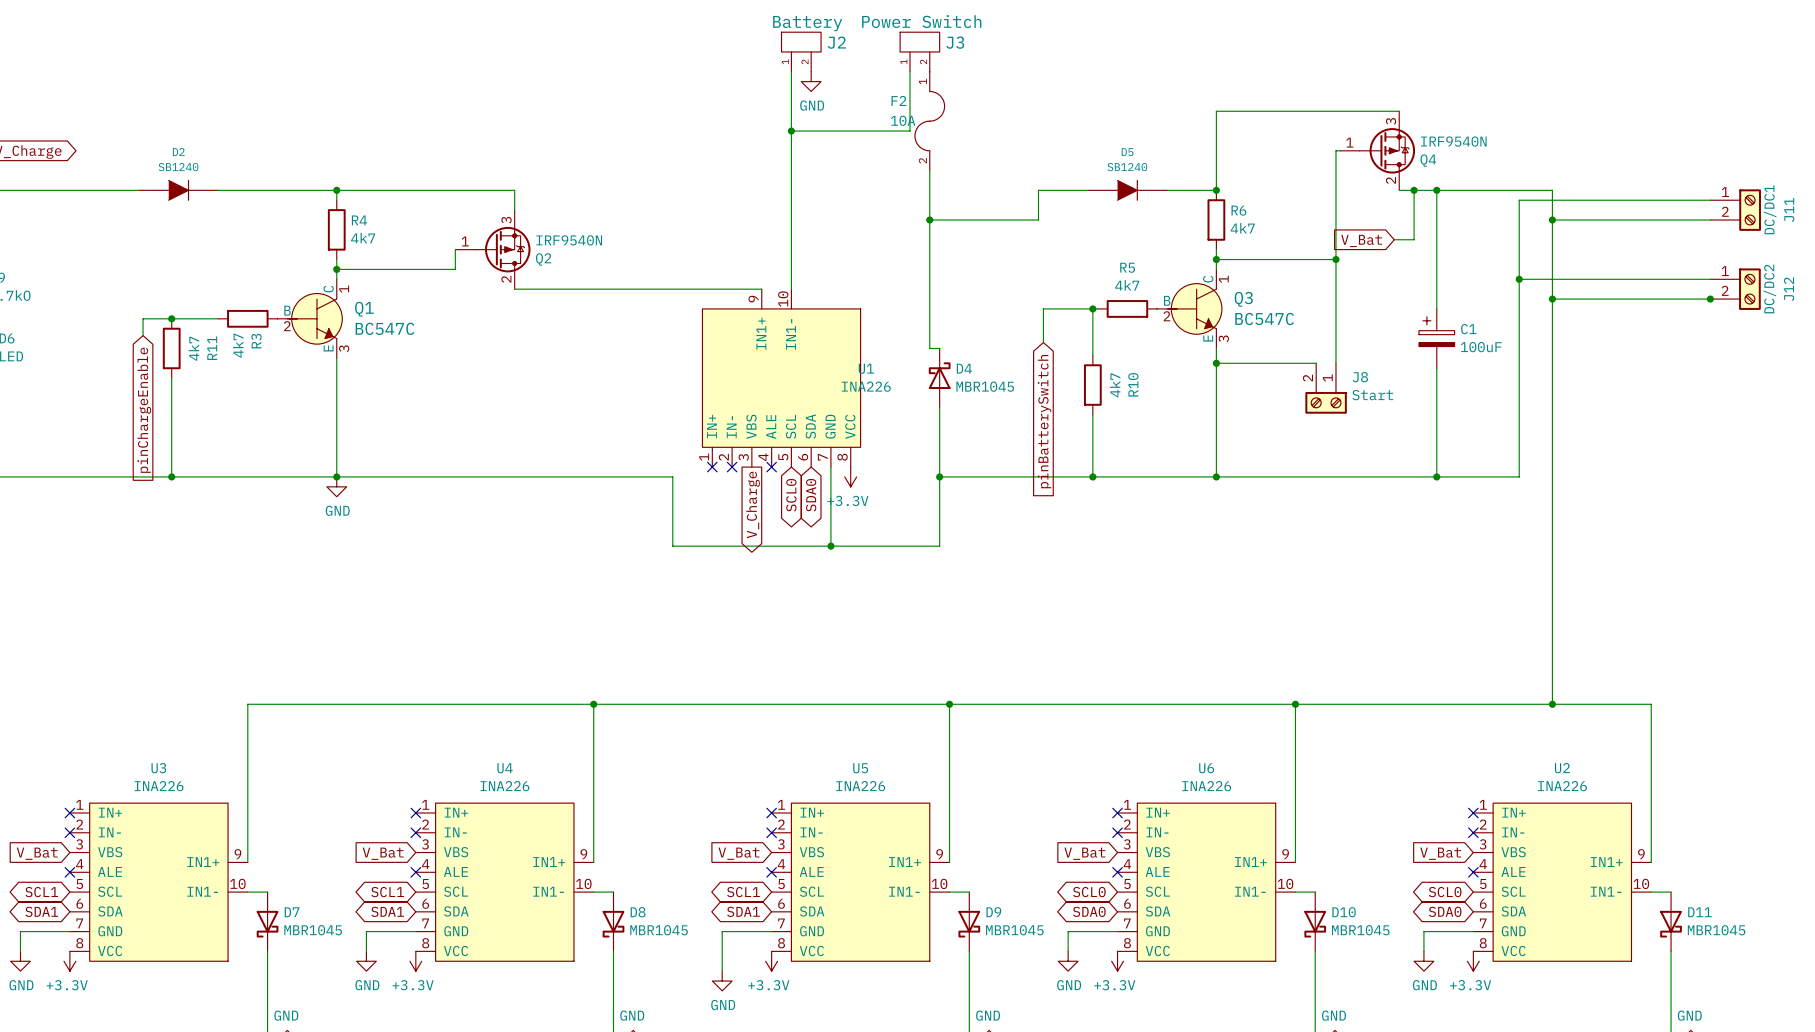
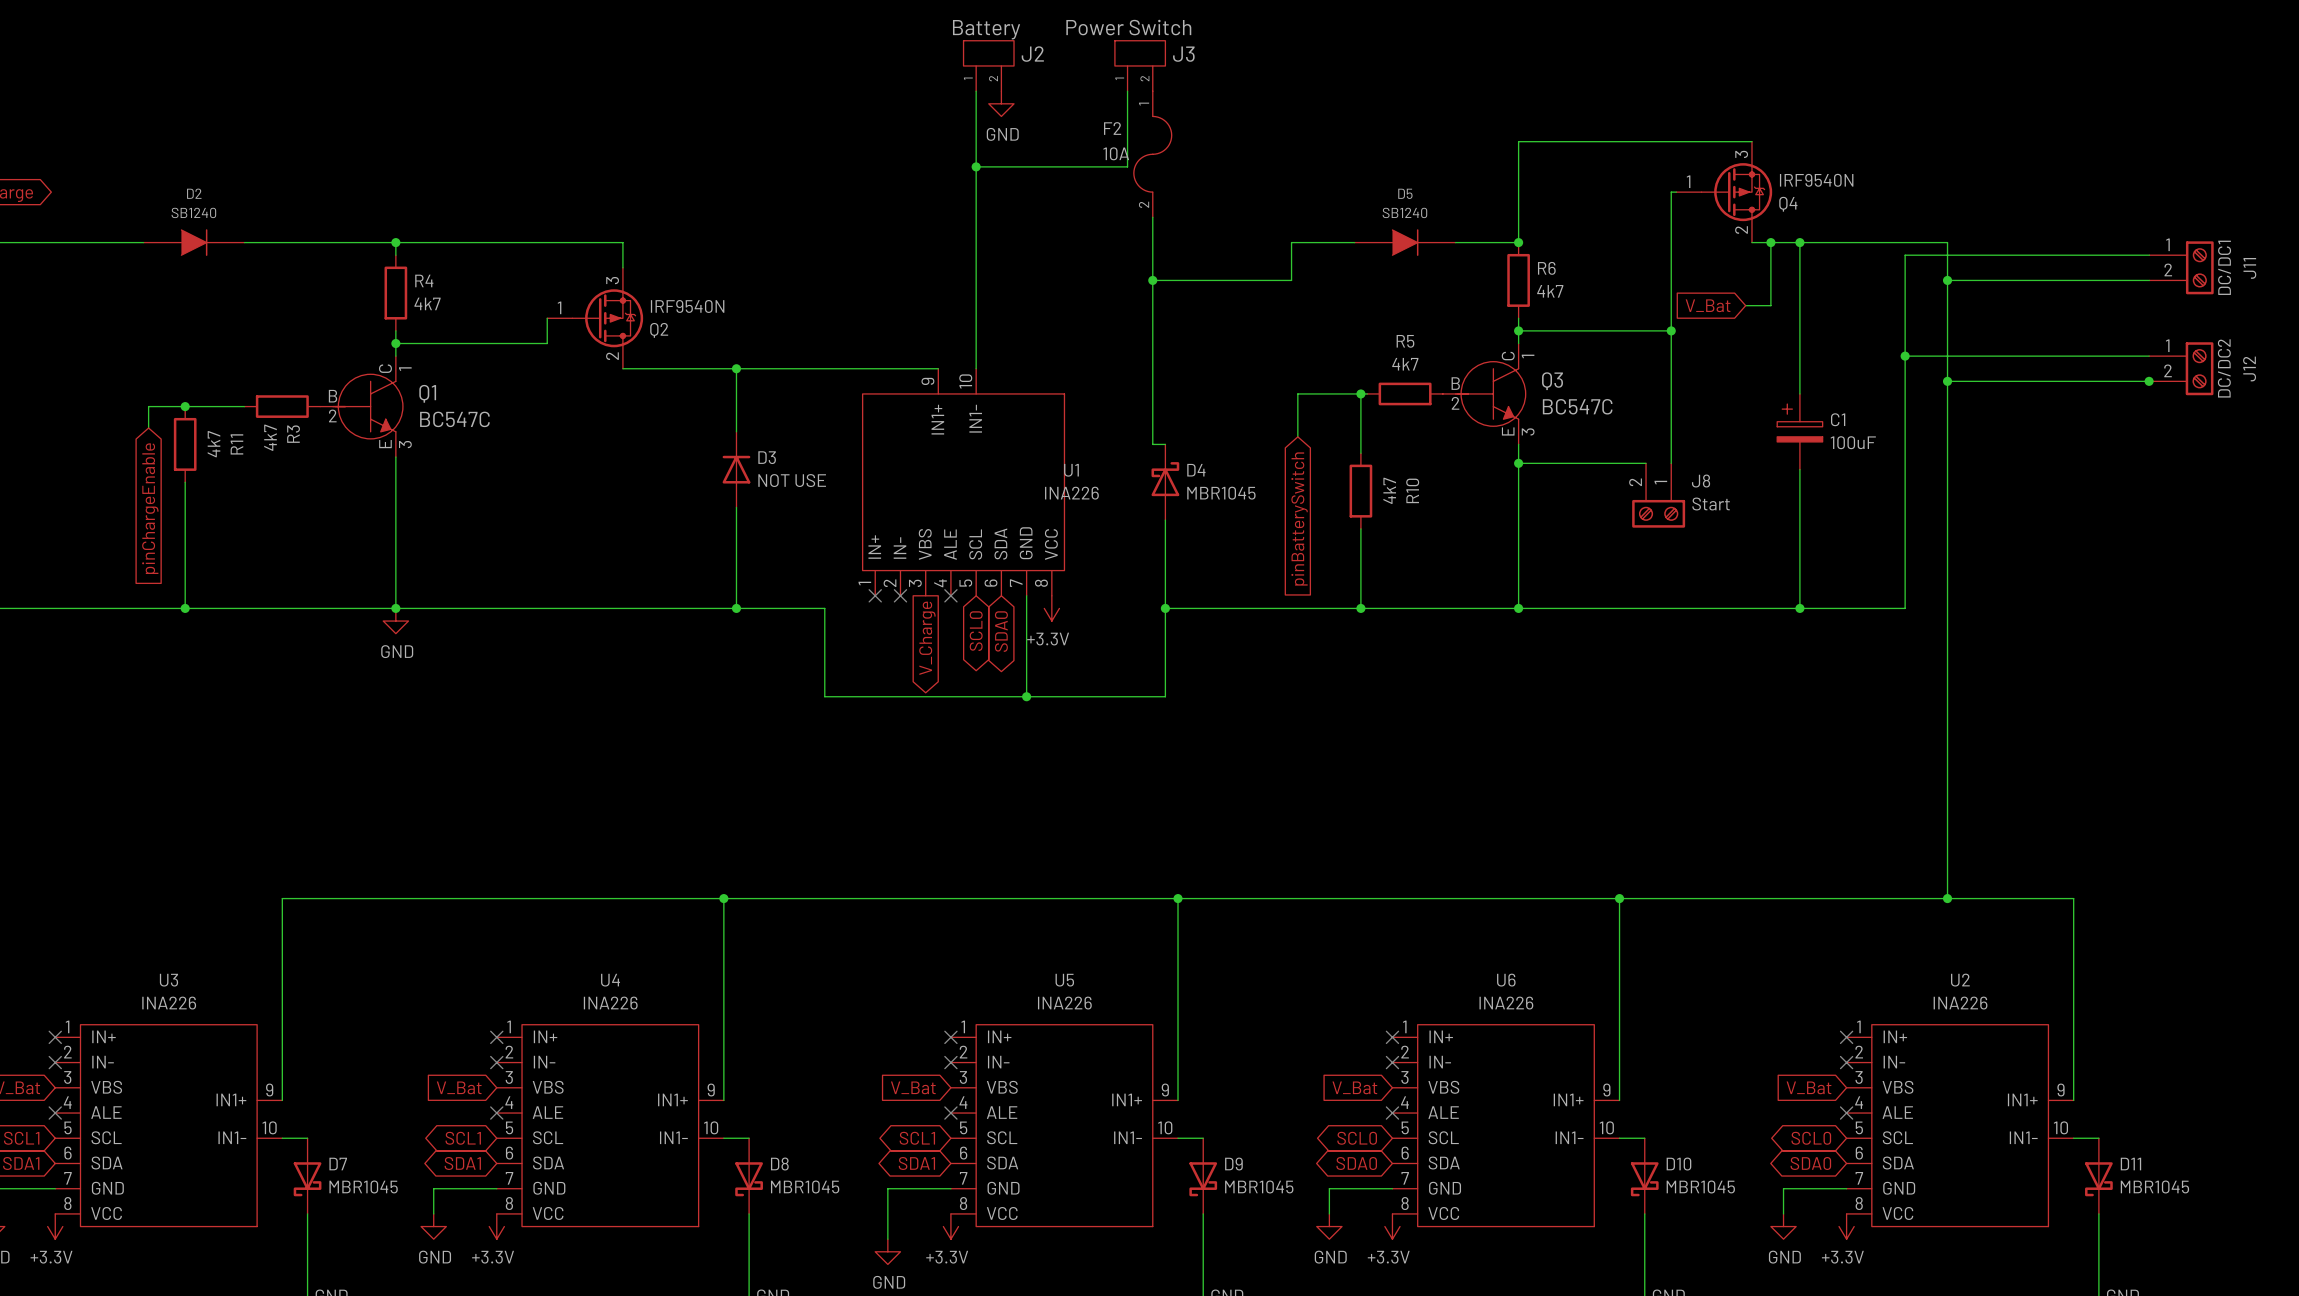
wire: none -> (736, 368) (736, 431)
junction: none -> (736, 368)
D3: none -> NOT USE (736, 469)
wire: none -> (736, 507) (736, 608)
junction: none -> (736, 608)

